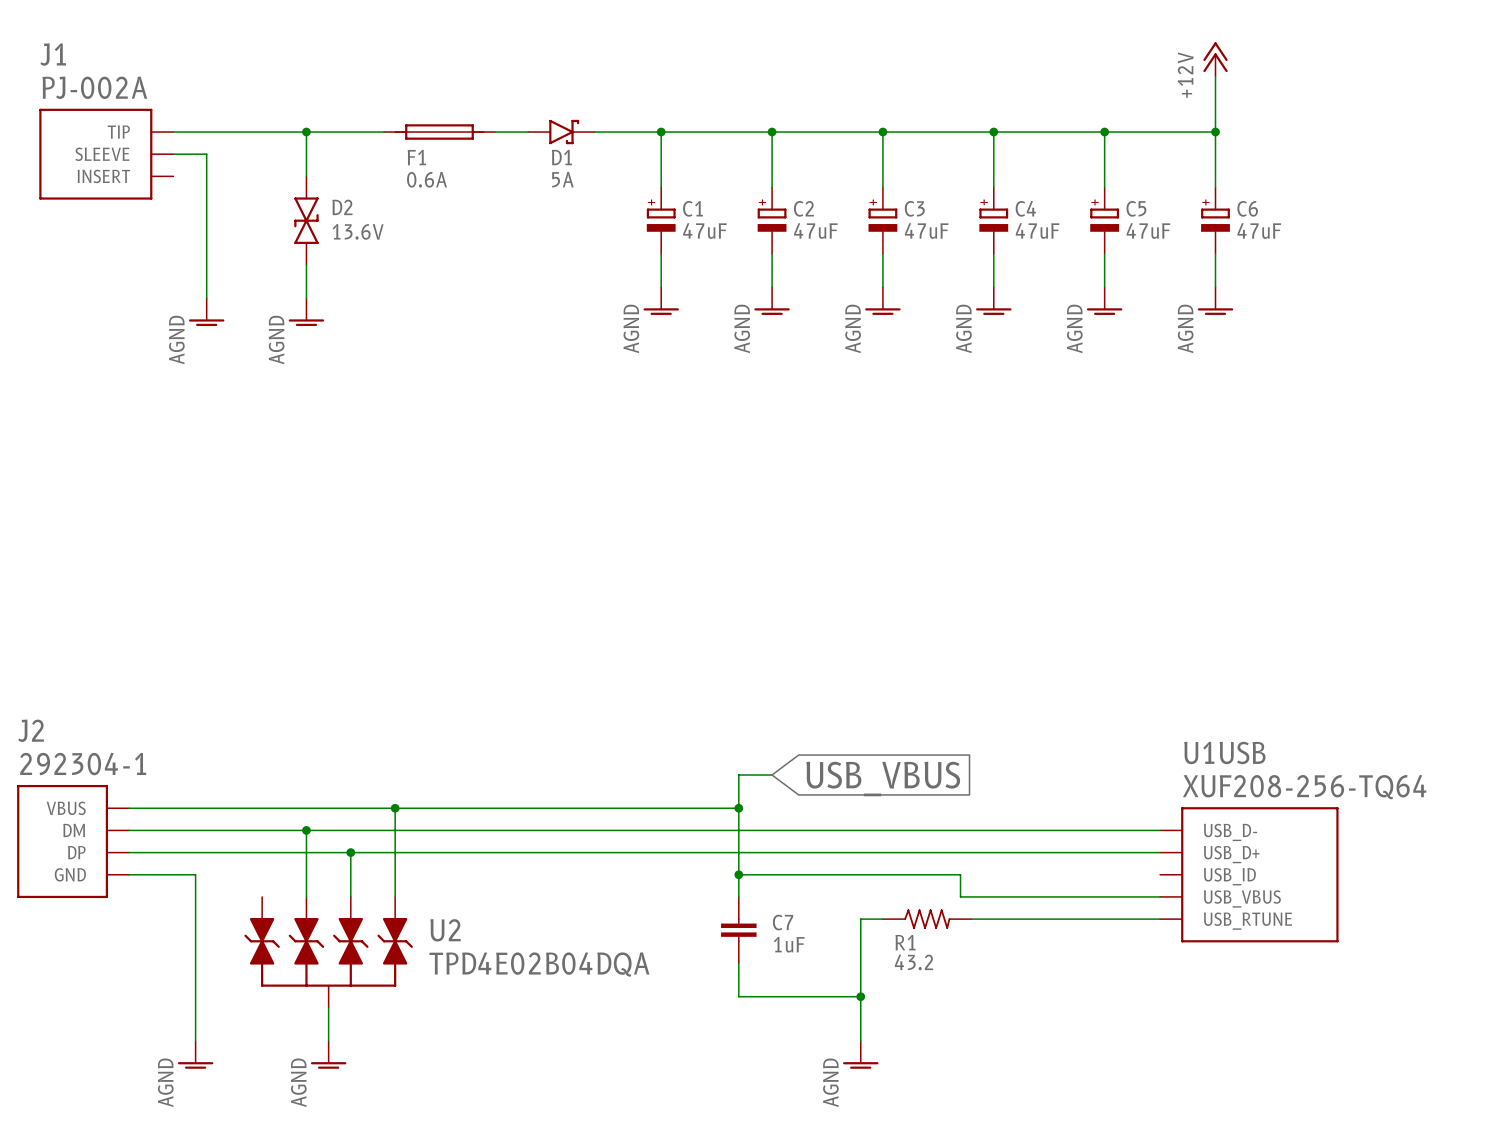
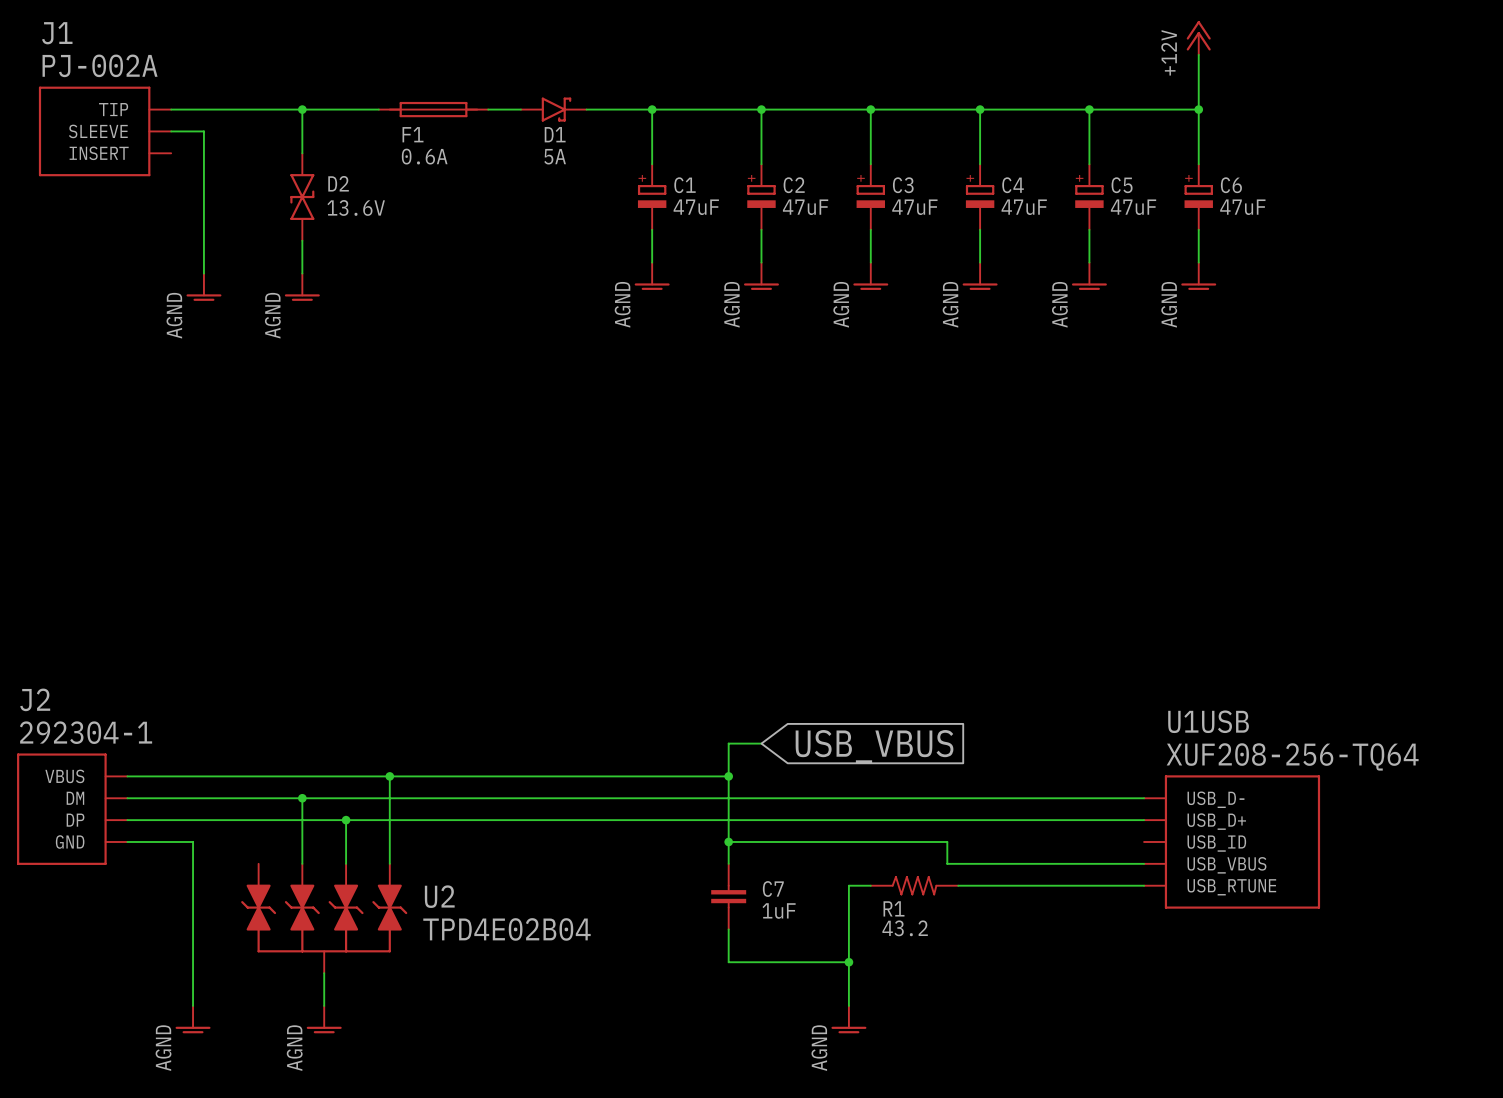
U2 value: TPD4E02B04DQA (539, 964) -> TPD4E02B04 (506, 929)

